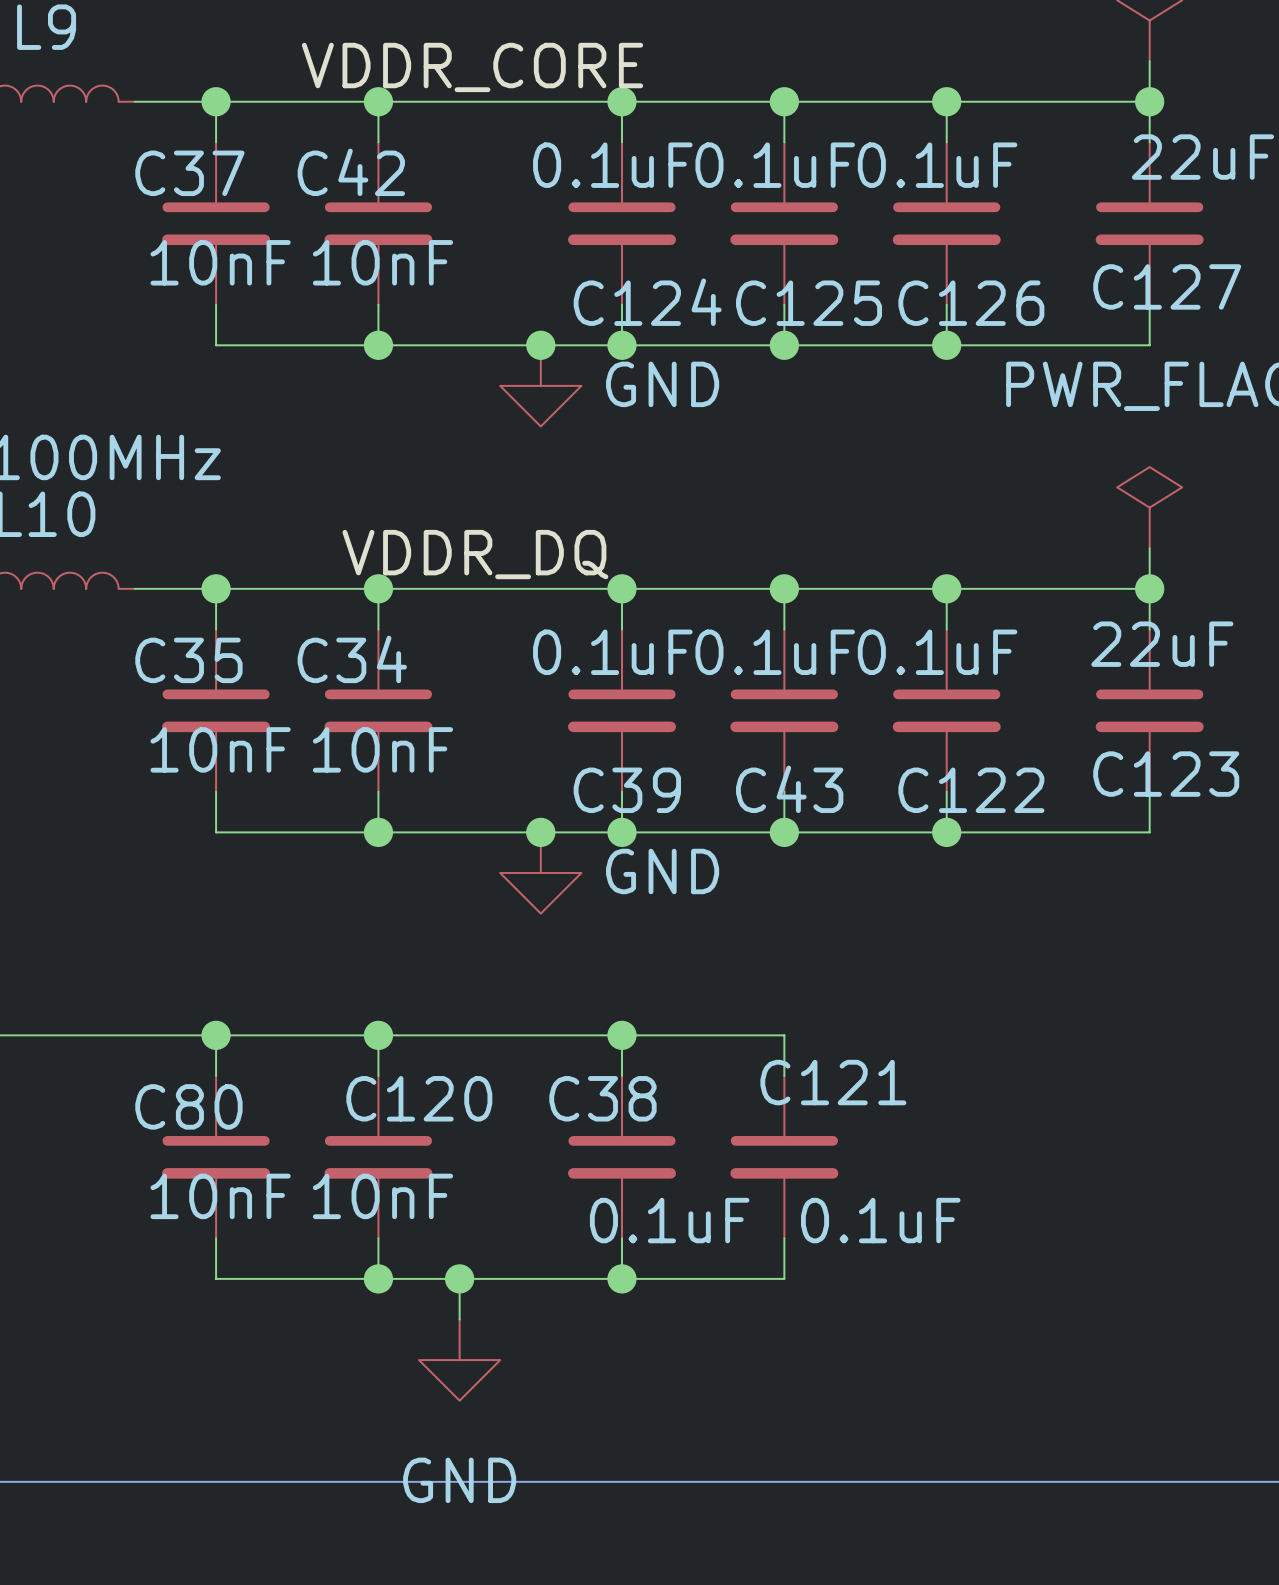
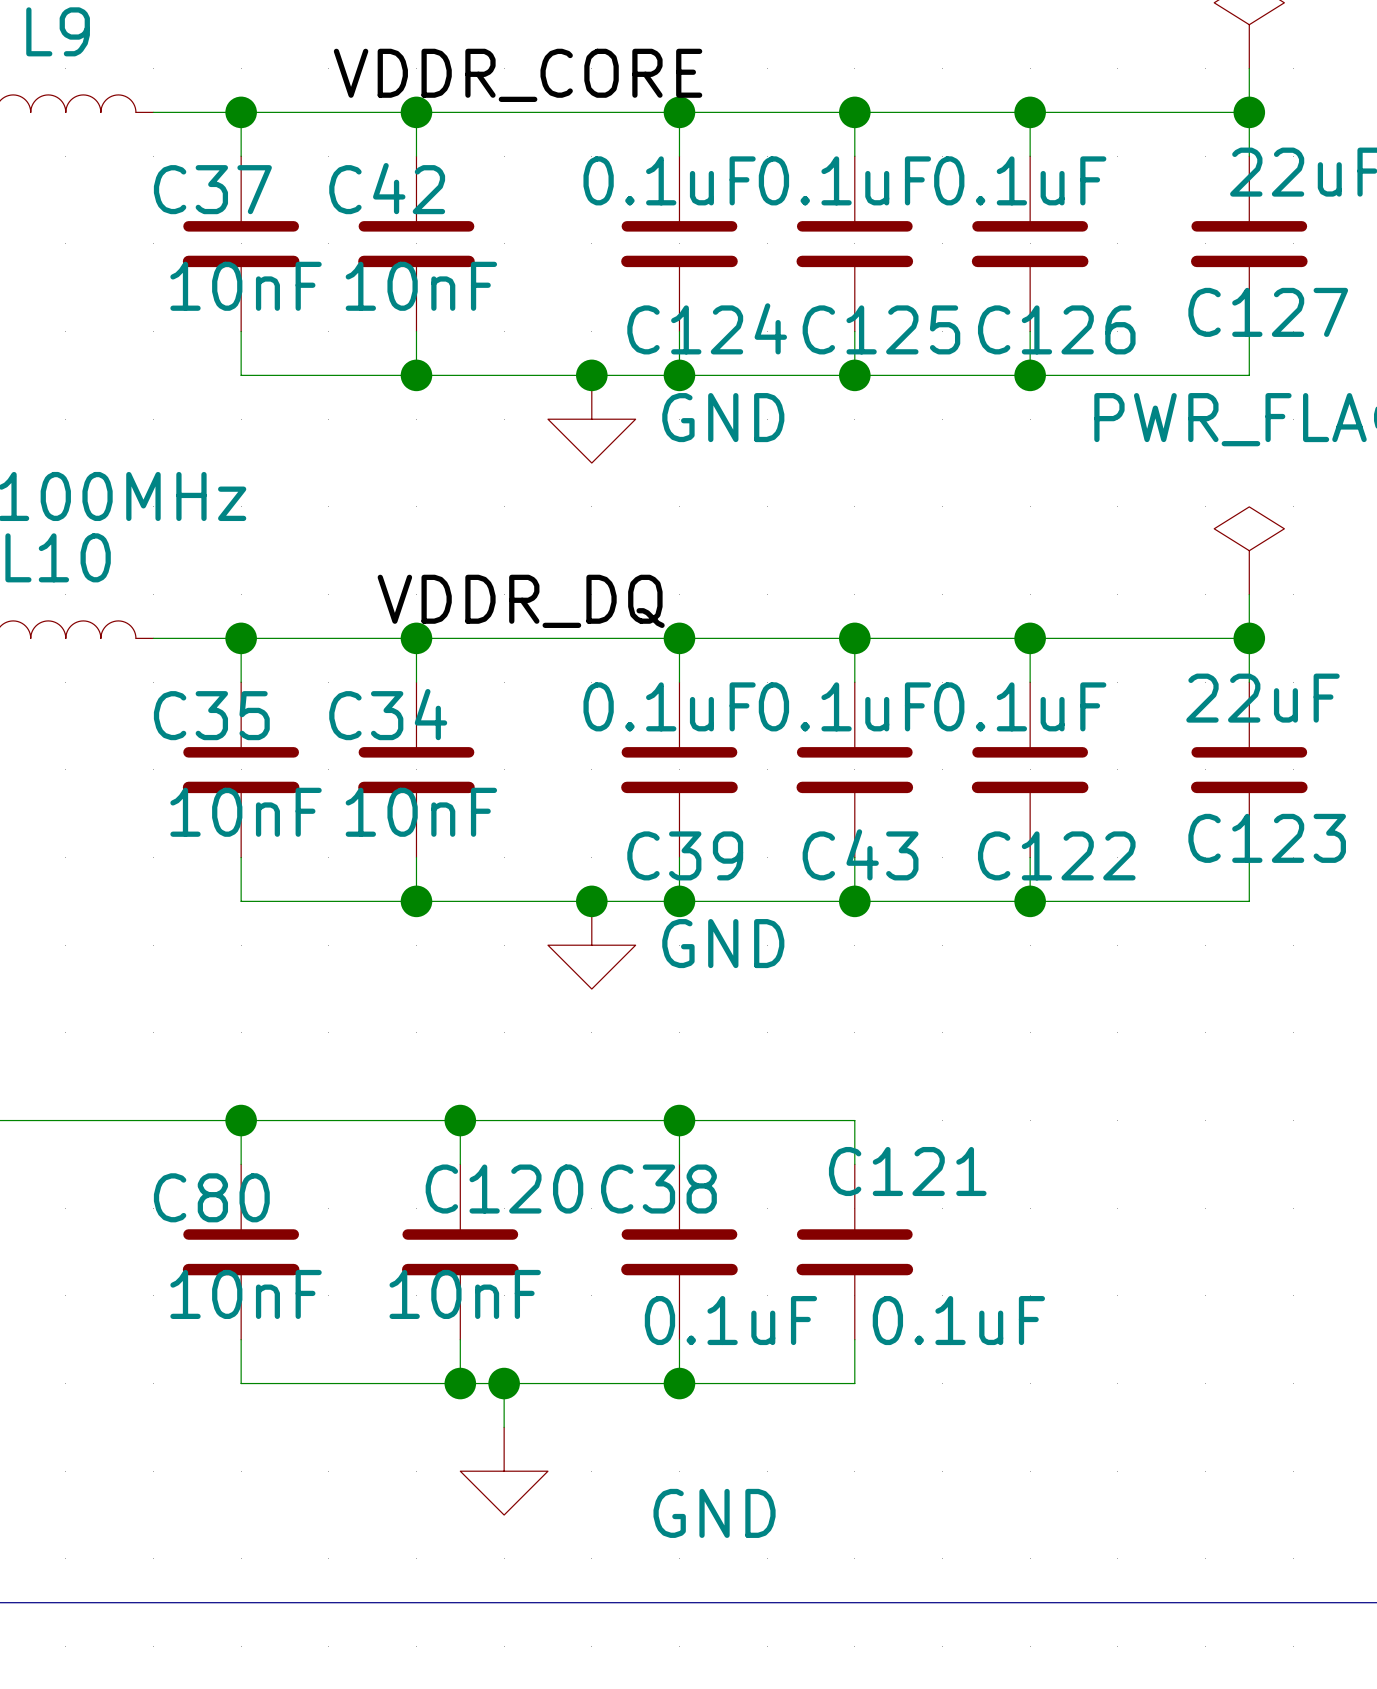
wire: (378, 1035) (378, 1075) -> (460, 1120) (460, 1164)
junction position: (378, 1035) -> (460, 1120)
C120 position: (378, 1157) -> (460, 1252)
wire: (378, 1238) (378, 1278) -> (460, 1339) (460, 1383)
junction position: (378, 1278) -> (460, 1383)
power symbol text position: GND (459, 1480) -> GND (714, 1513)

